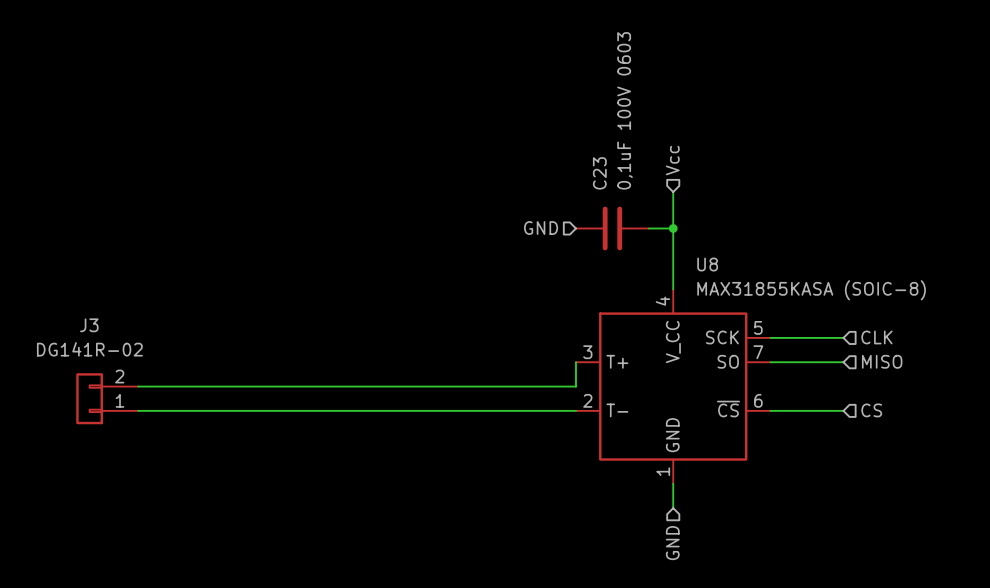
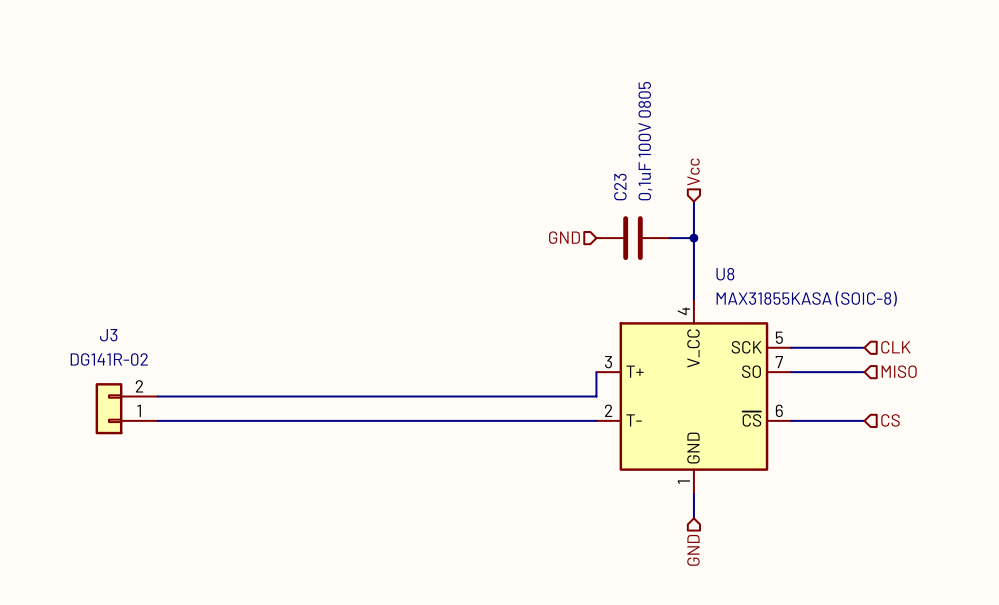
C23 value: 0,1uF 100V 0603 (625, 110) -> 0,1uF 100V 0805 (645, 141)

